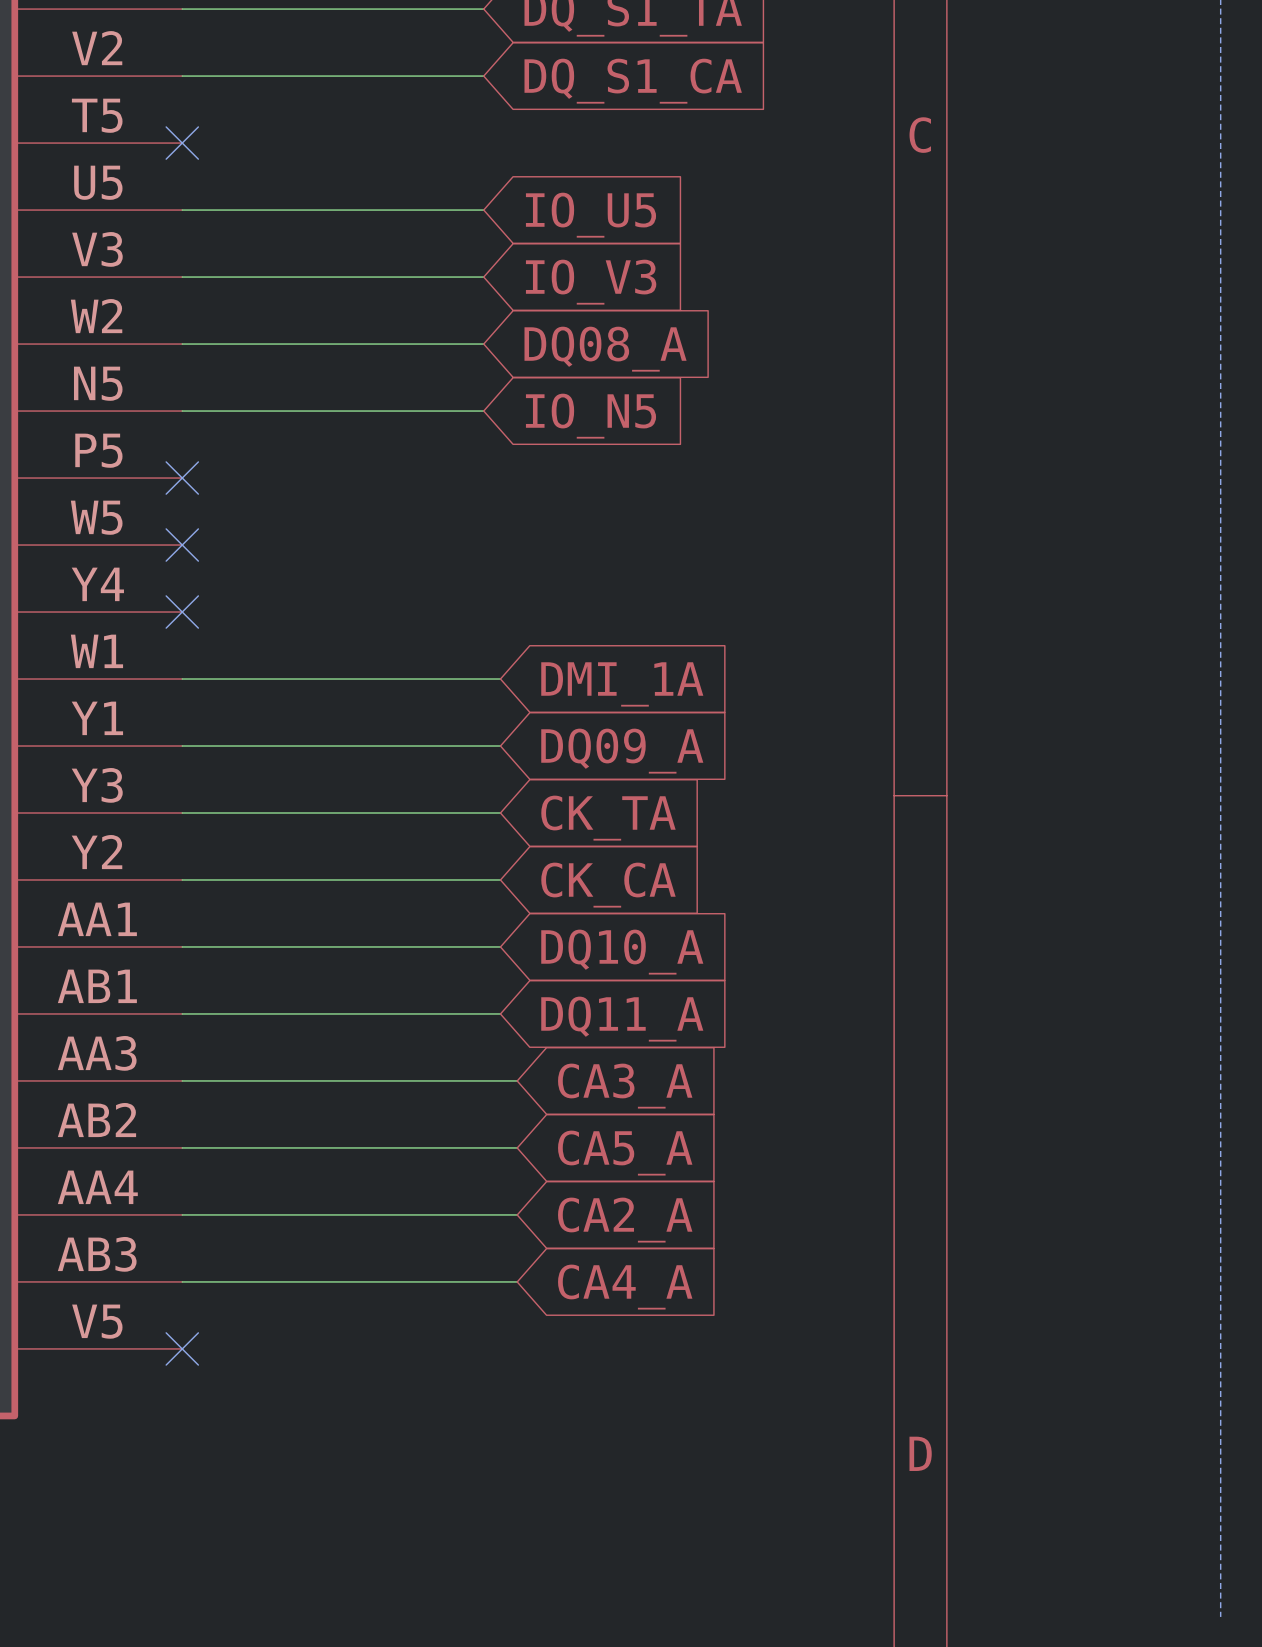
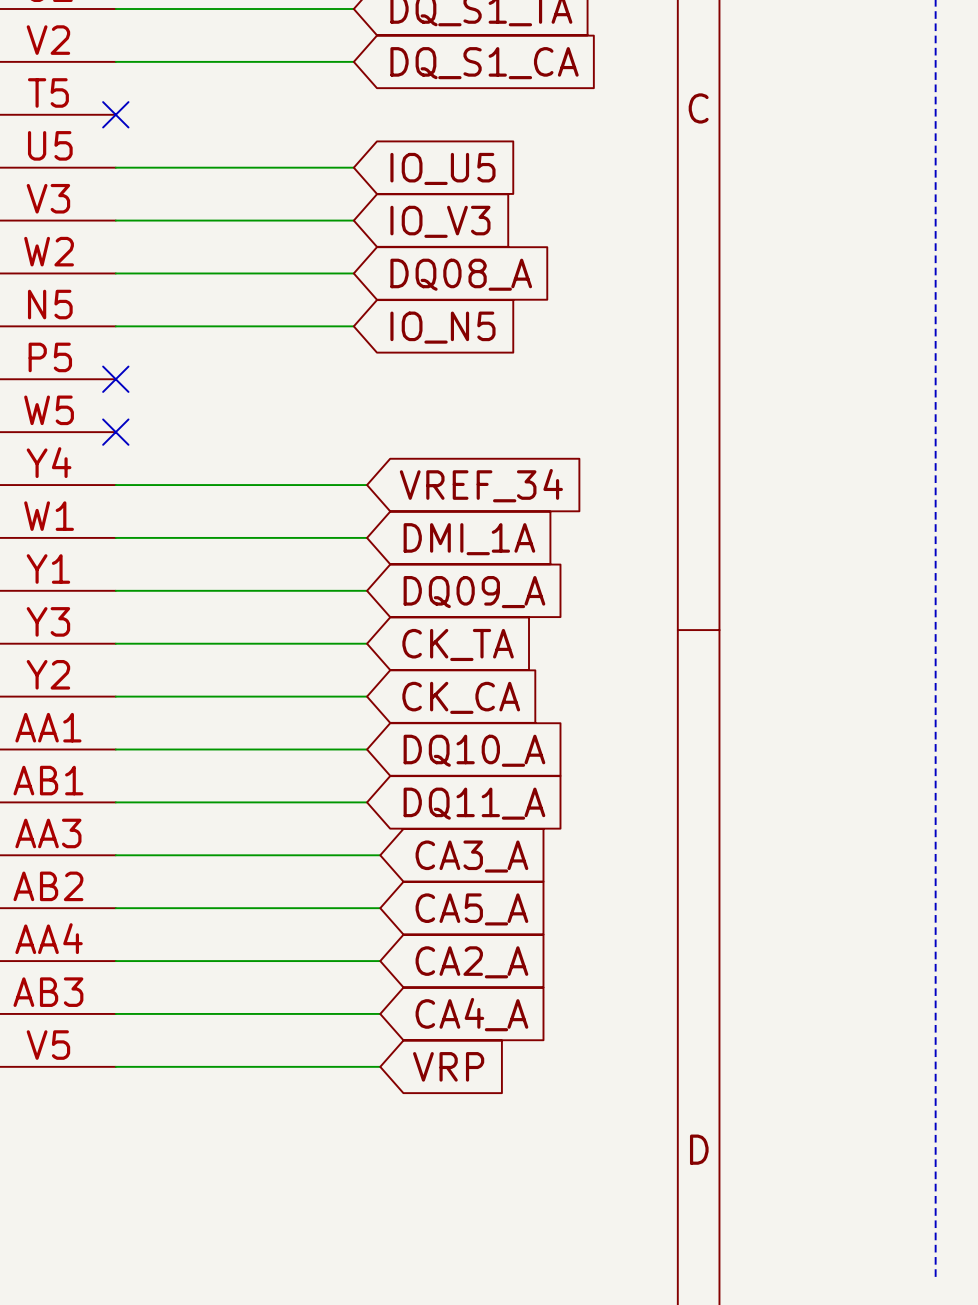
wire: none -> (115, 485) (367, 485)
no-connect mark: (182, 612) -> none
global label: none -> VREF_34 (481, 485)
wire: none -> (115, 1066) (380, 1066)
no-connect mark: (182, 1348) -> none
global label: none -> VRP (448, 1066)

